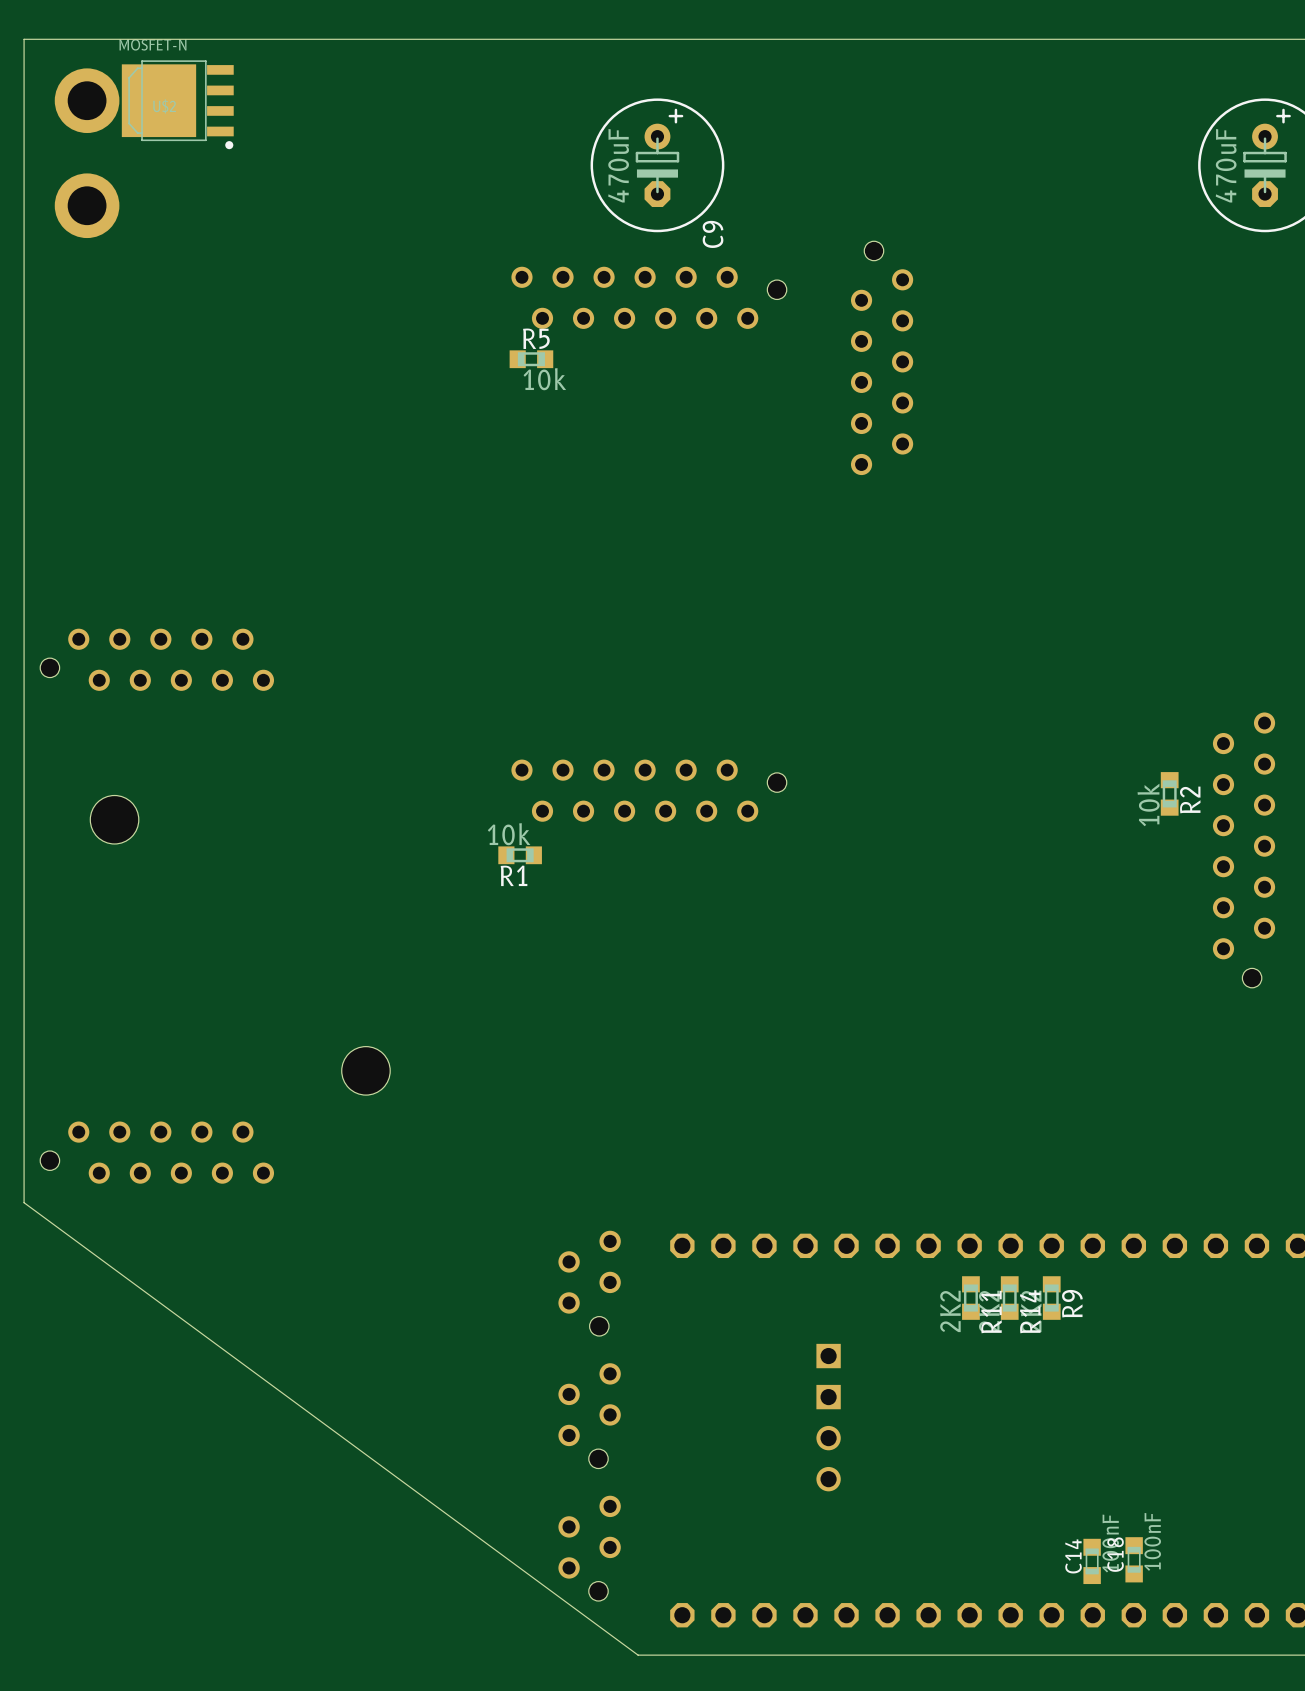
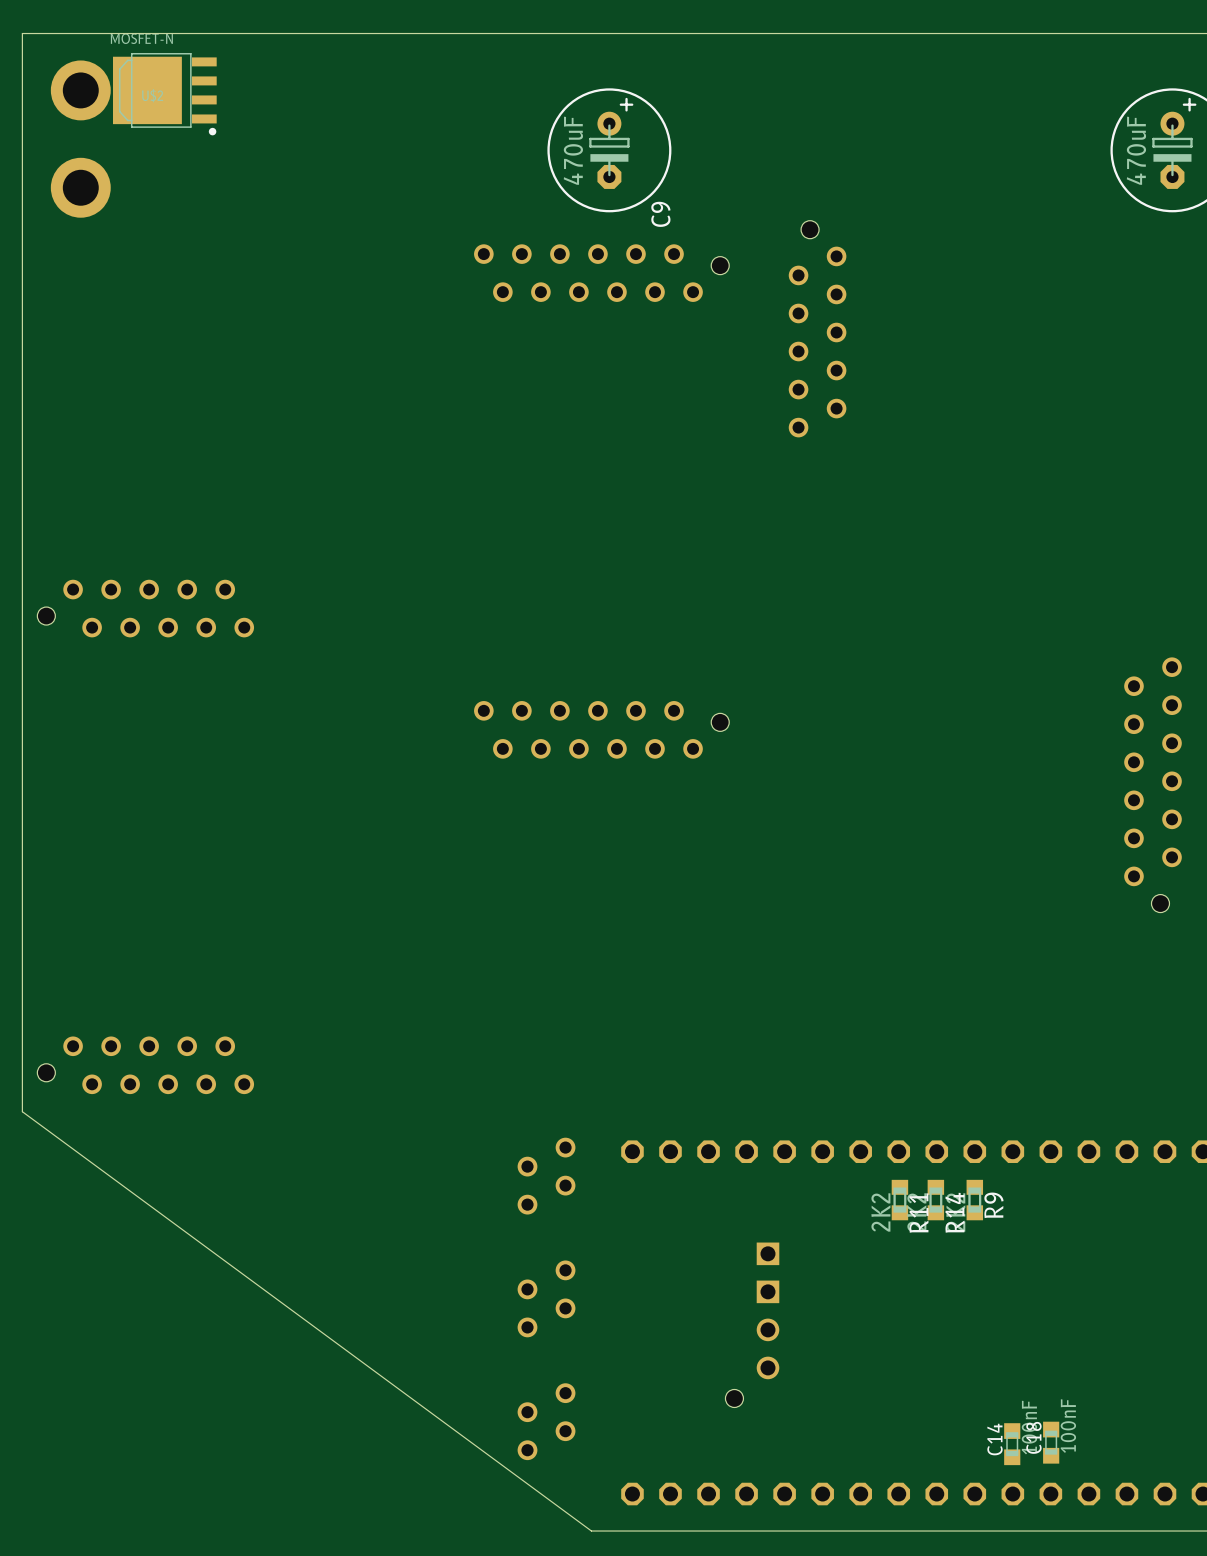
R5: 10k (531, 359) -> none
R2: 10k (1169, 793) -> none
hole: (114, 819) -> none
R1: 10k (520, 855) -> none
hole: (365, 1070) -> none
hole: (599, 1326) -> none
hole: (598, 1458) -> none
hole: none -> (734, 1398)
hole: (598, 1591) -> none

